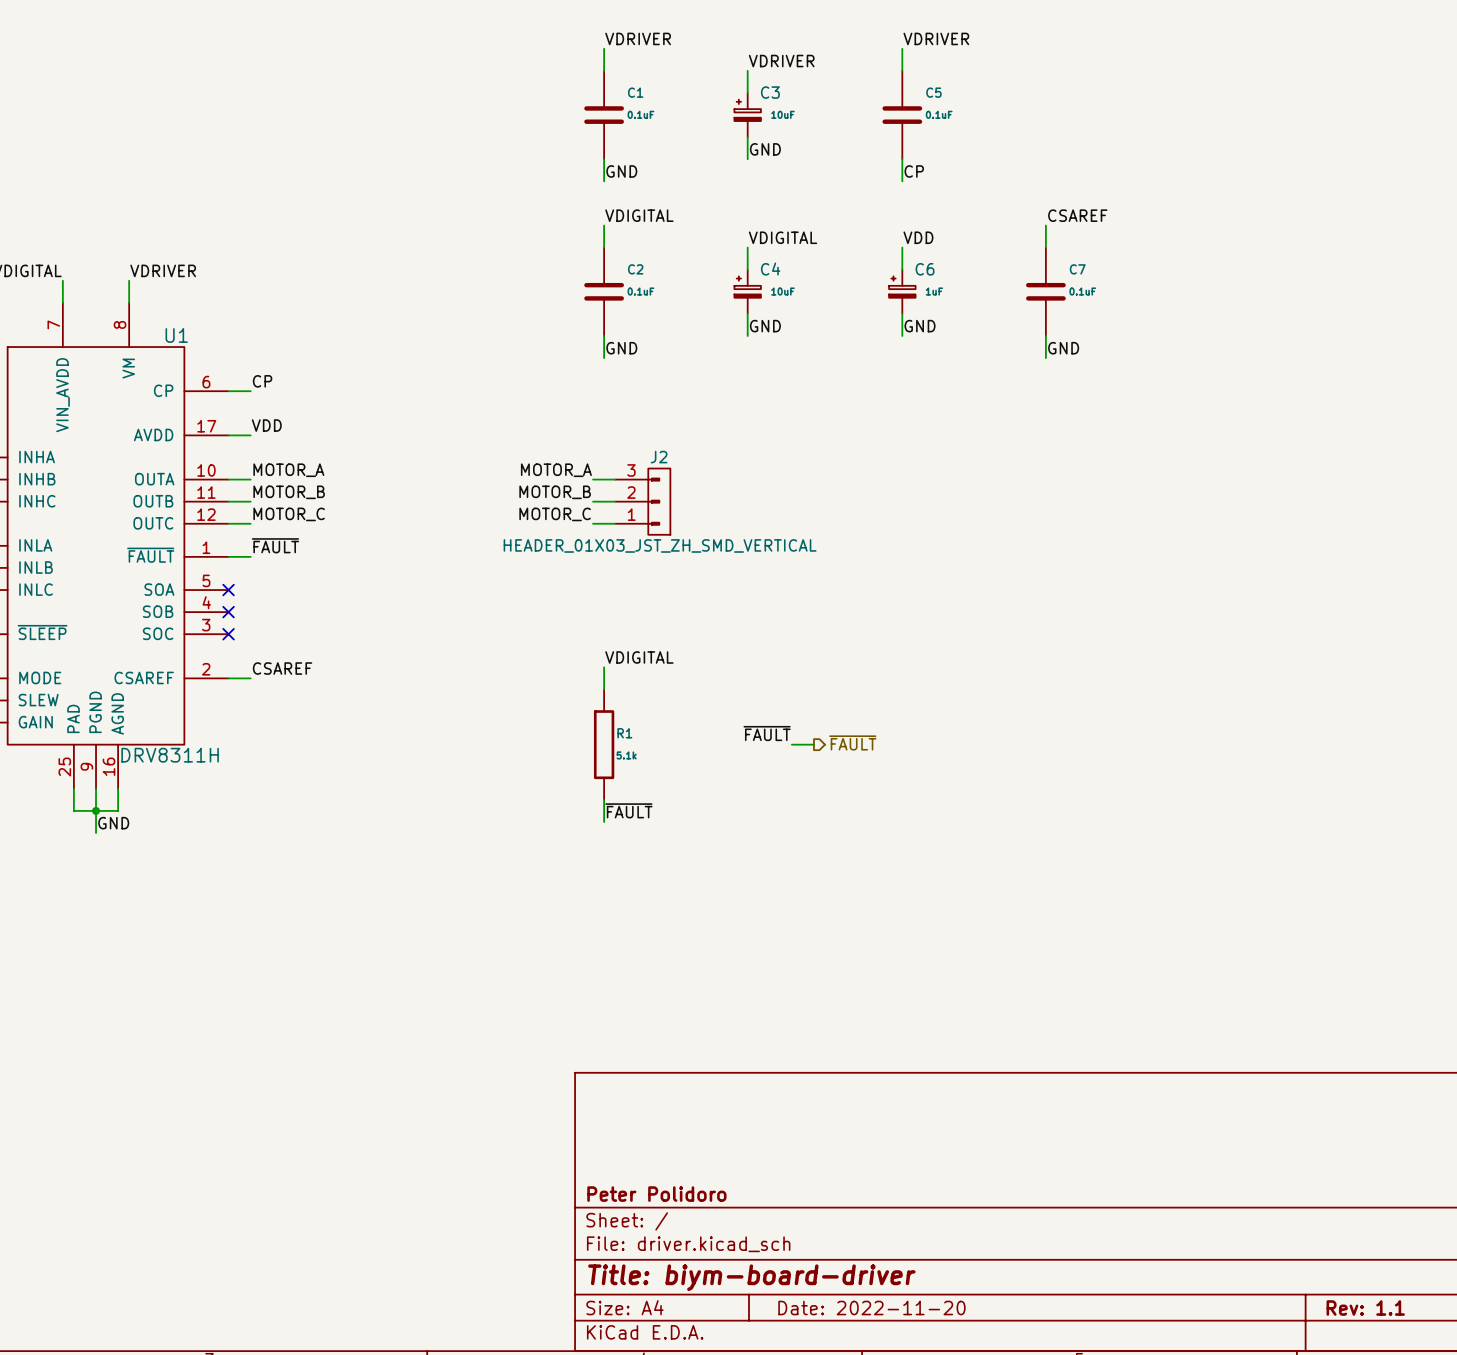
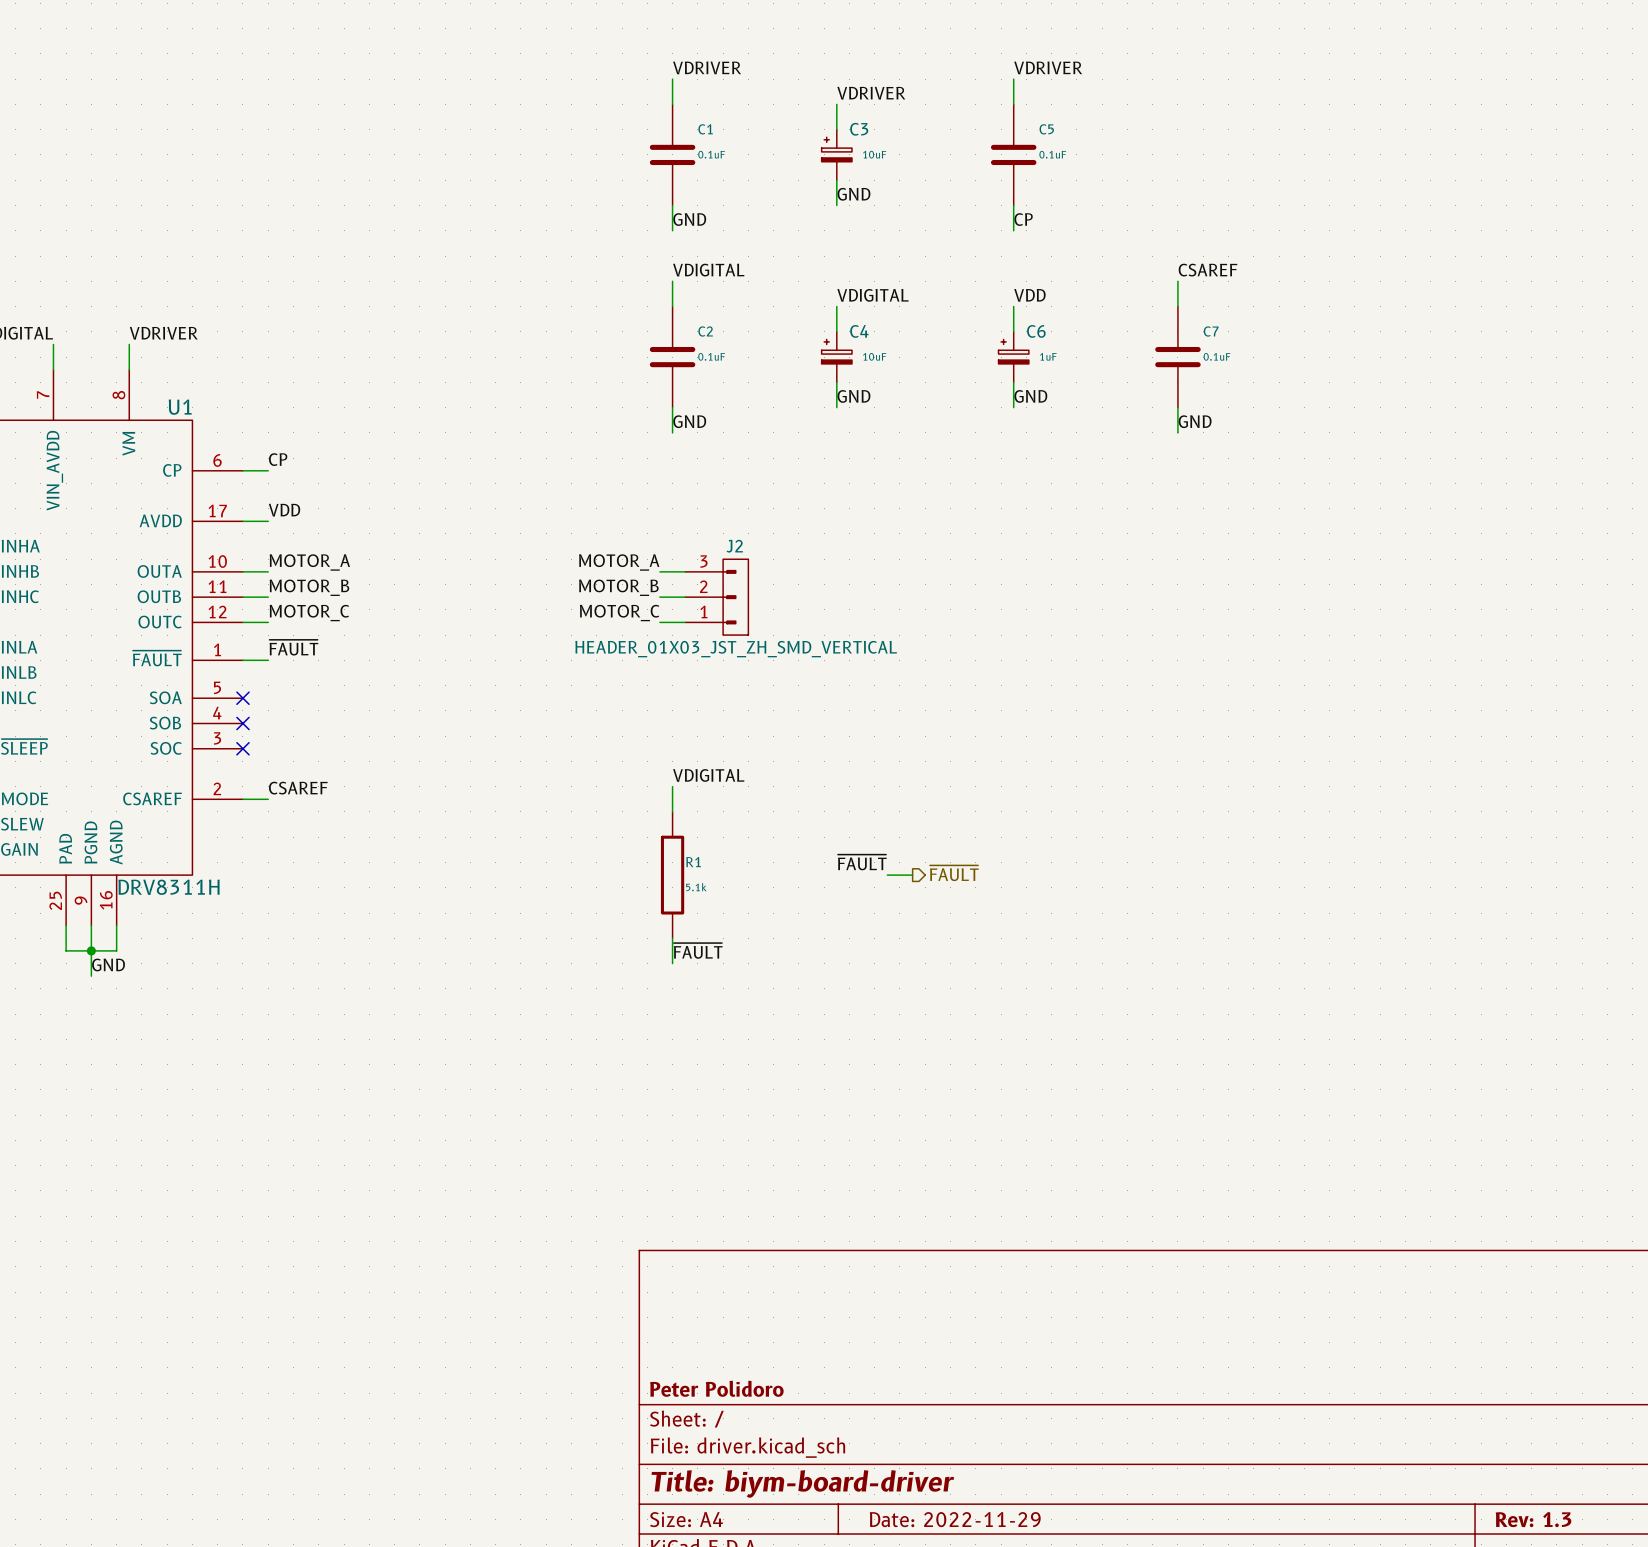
title block: Date: 2022-11-20 (871, 1308) -> Date: 2022-11-29 (955, 1519)
title block: Rev: 1.1 (1365, 1308) -> Rev: 1.3 (1533, 1519)

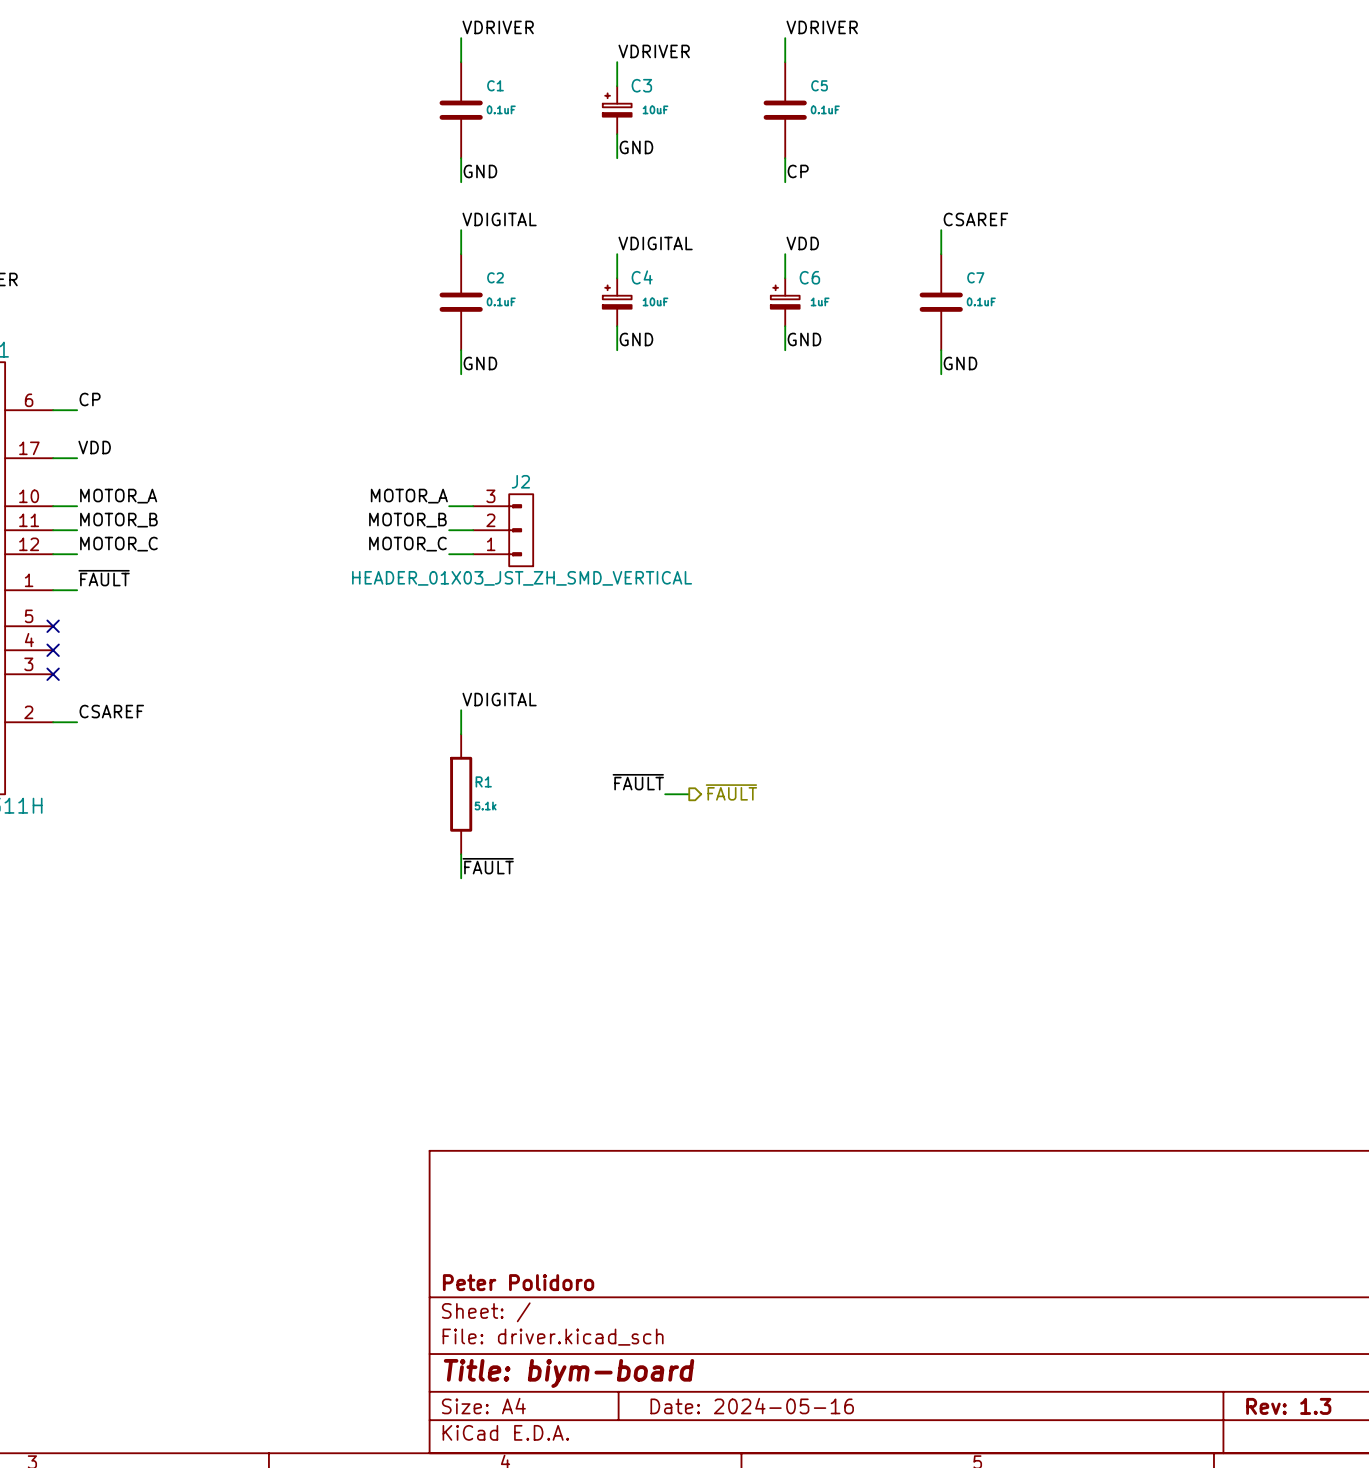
title block: Title: biym-board-driver (802, 1483) -> Title: biym-board (569, 1373)
title block: Date: 2022-11-29 (955, 1519) -> Date: 2024-05-16 (752, 1406)

